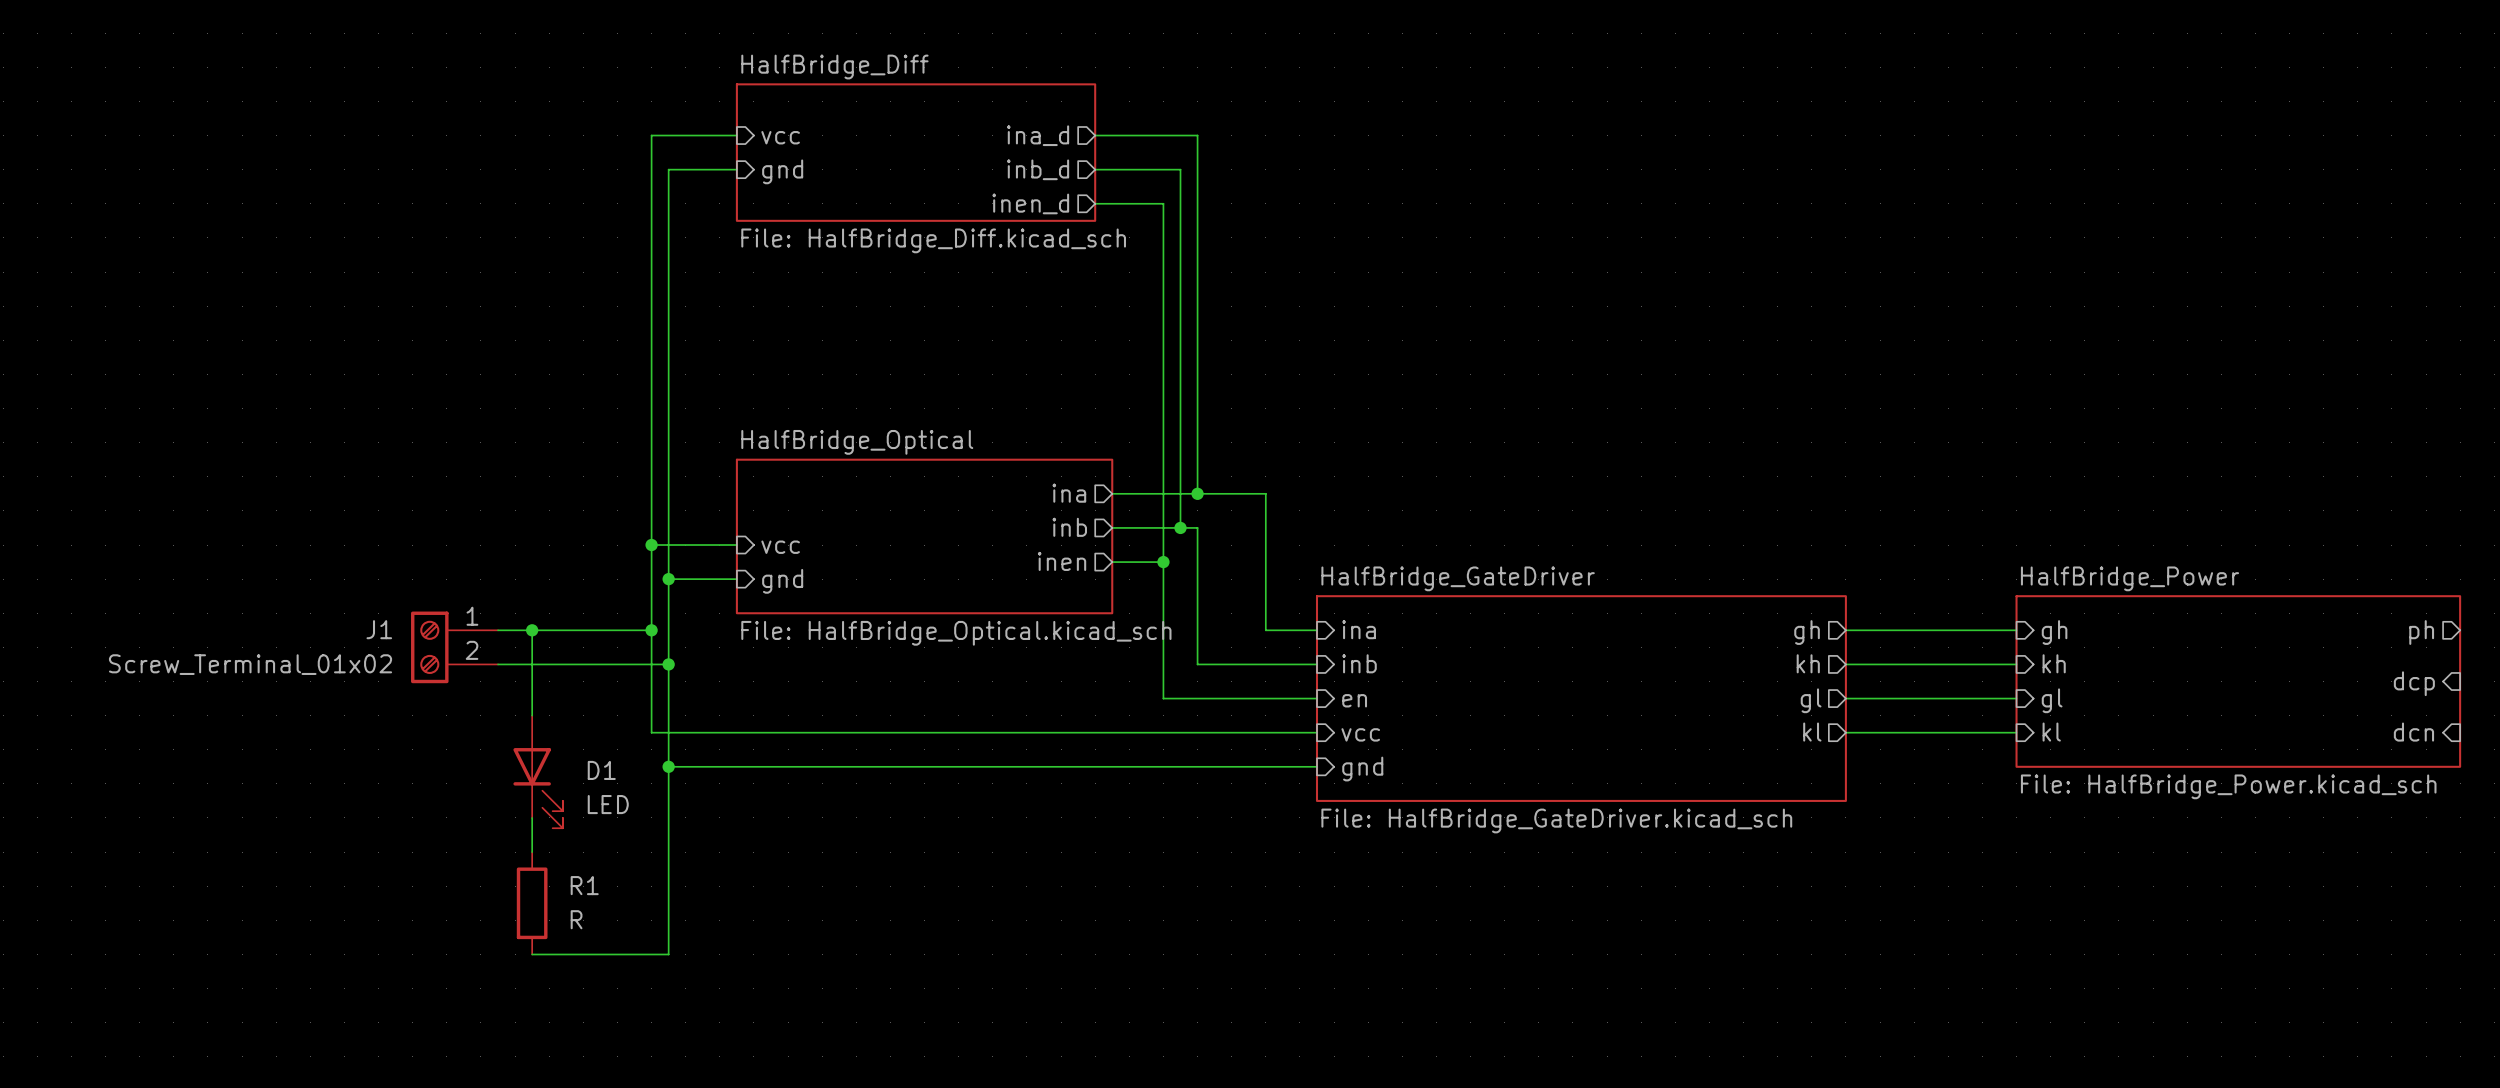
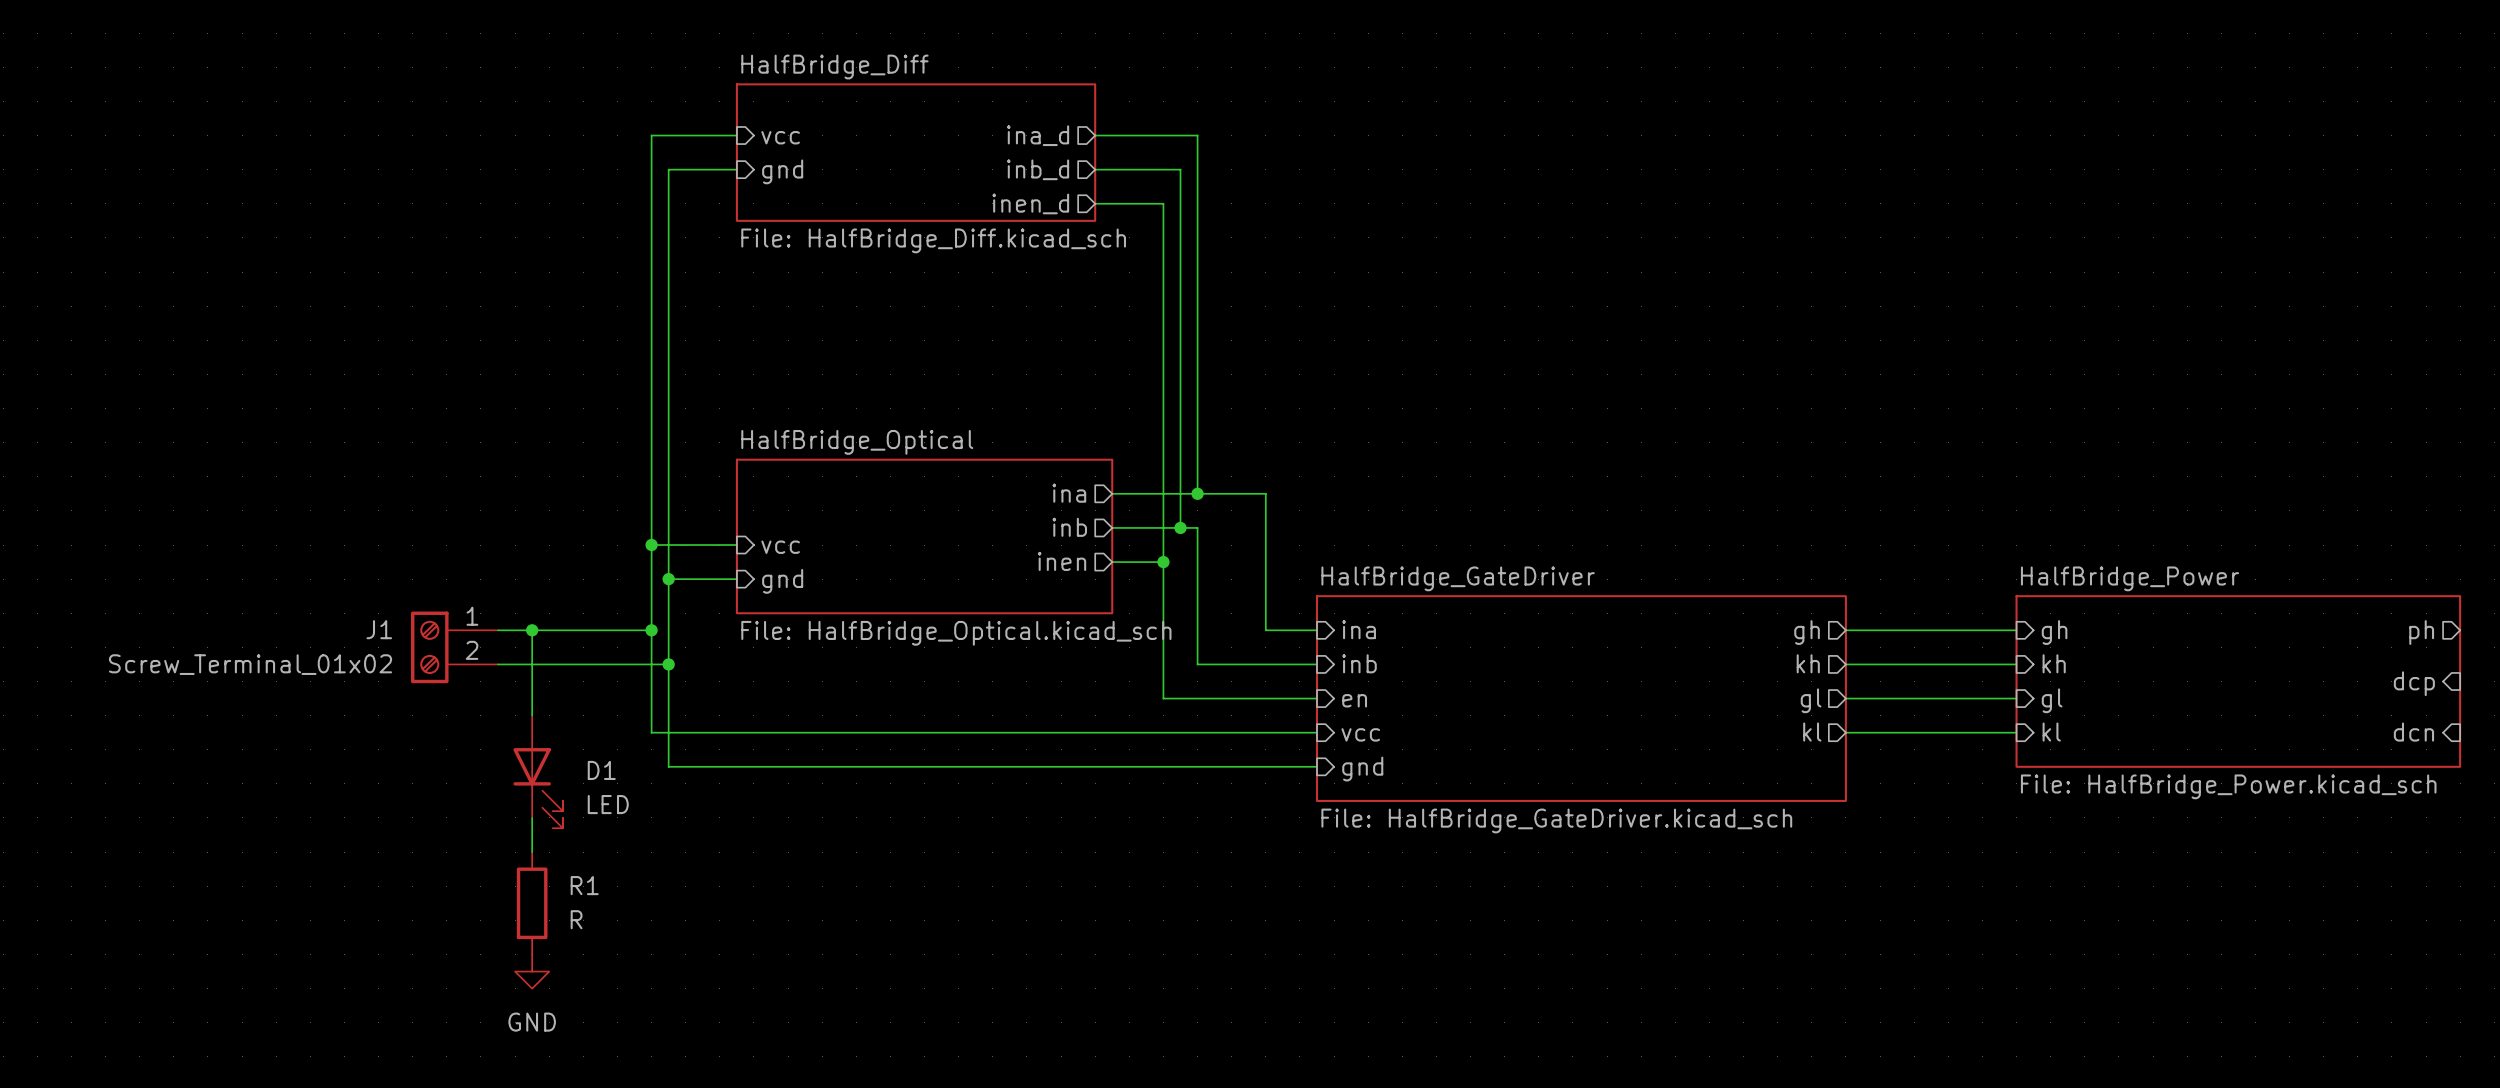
wire: (668, 766) (668, 954) (532, 954) -> none
junction: (668, 766) -> none
power symbol: none -> GND (532, 971)

